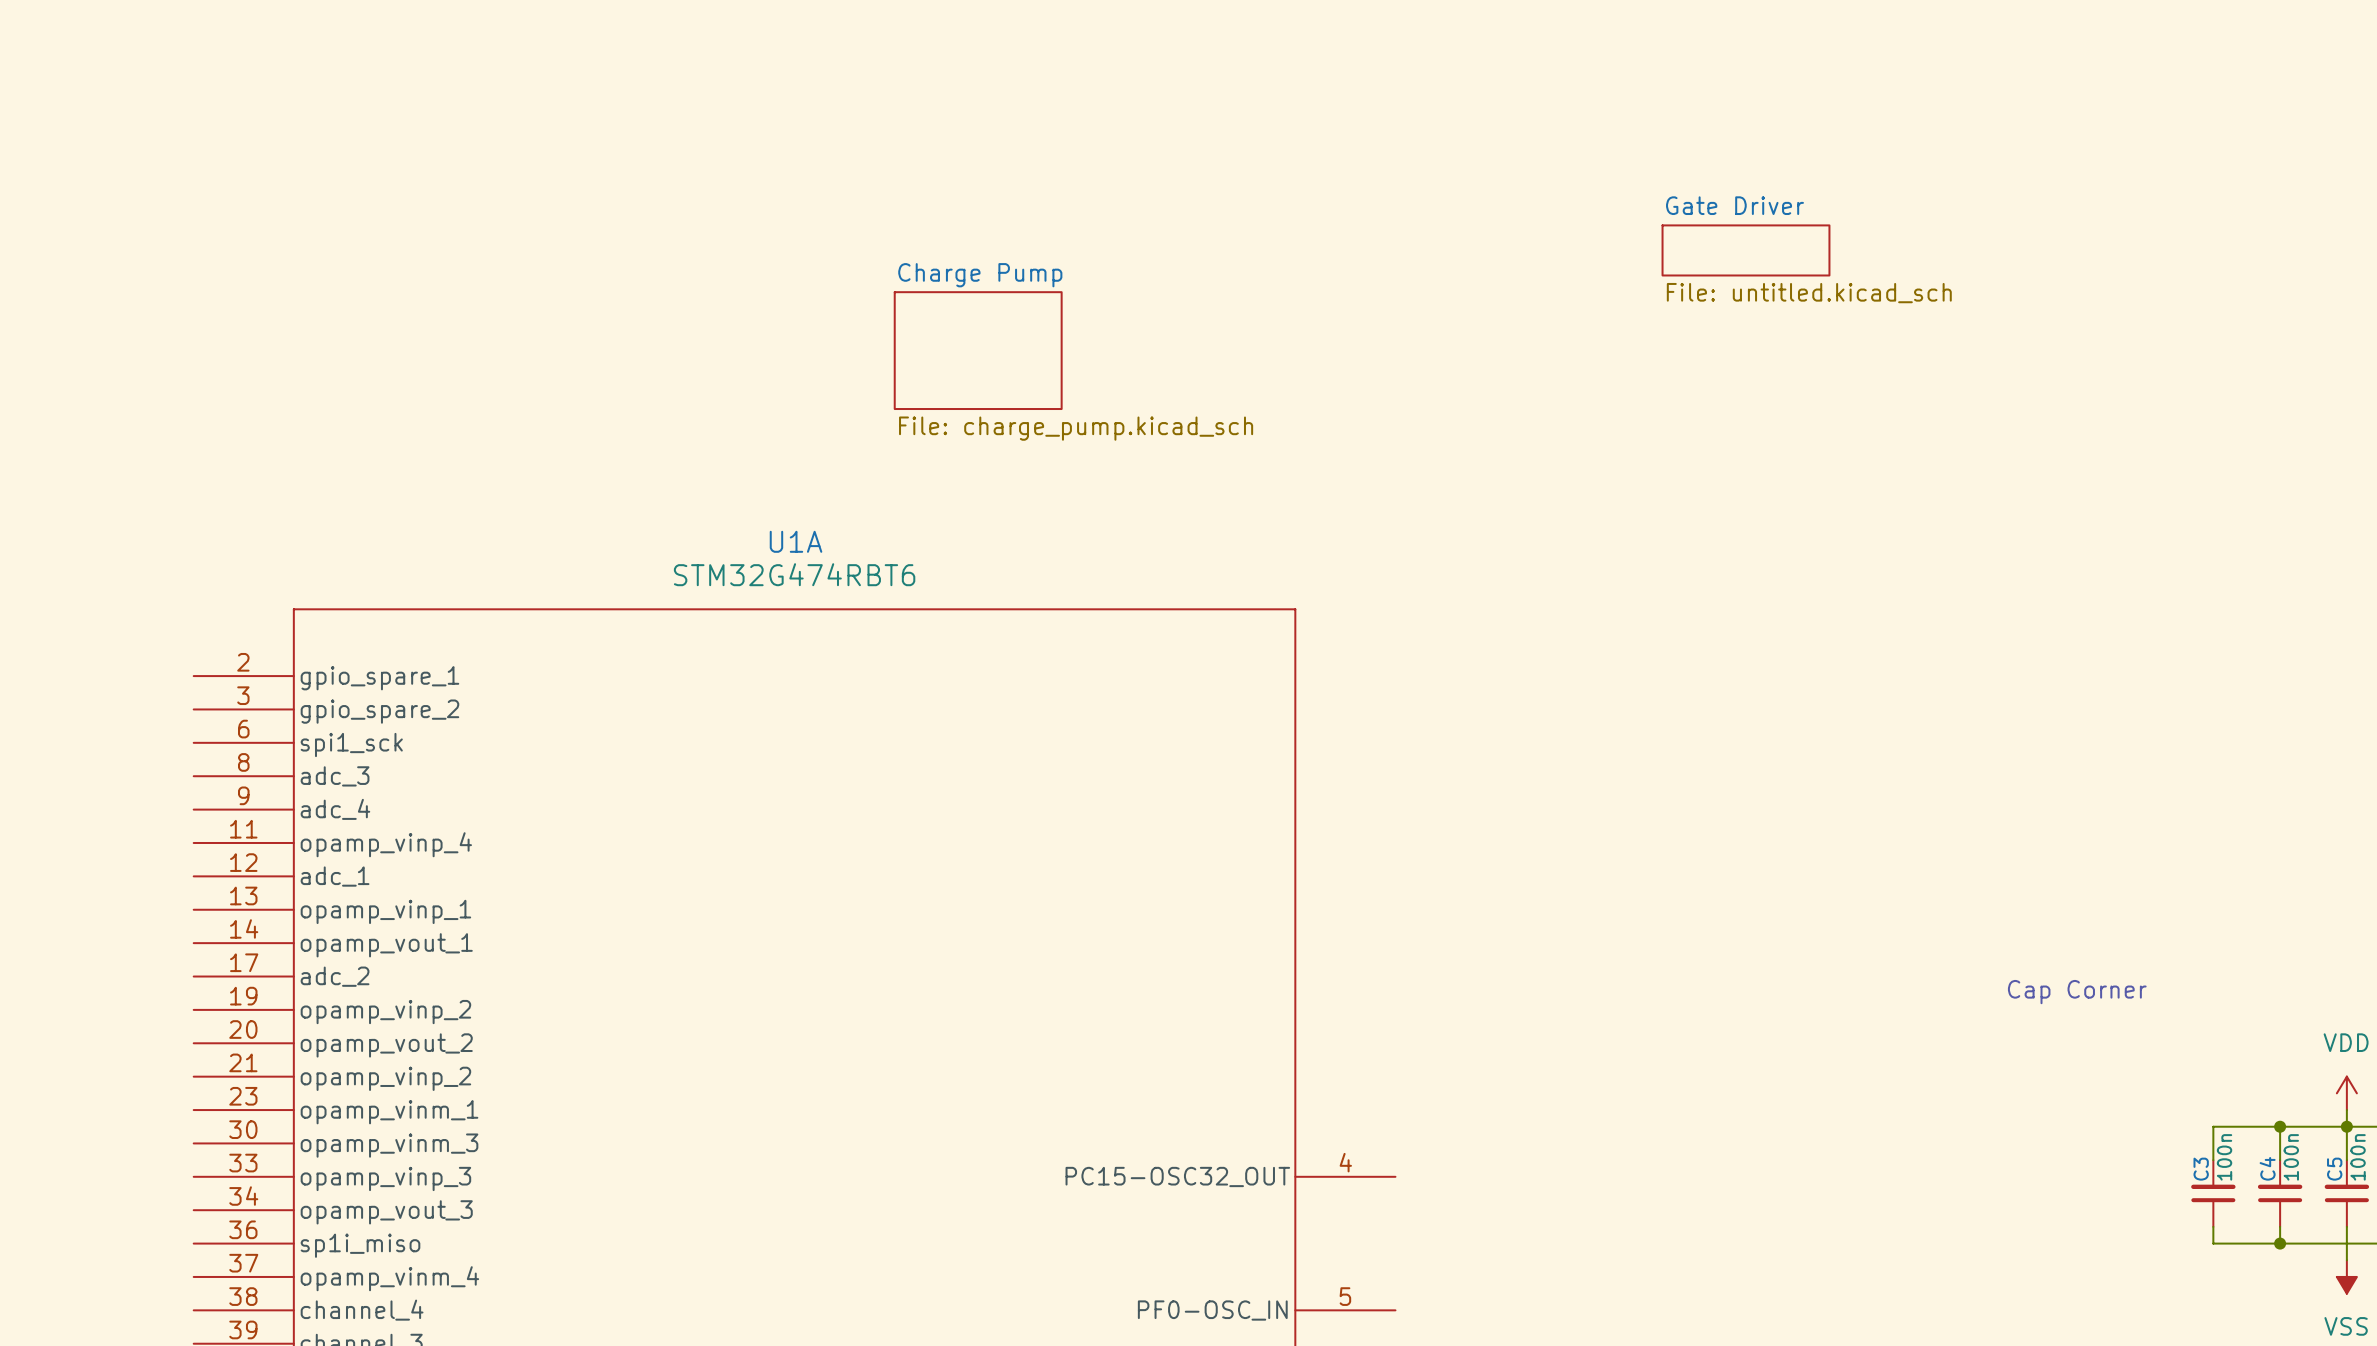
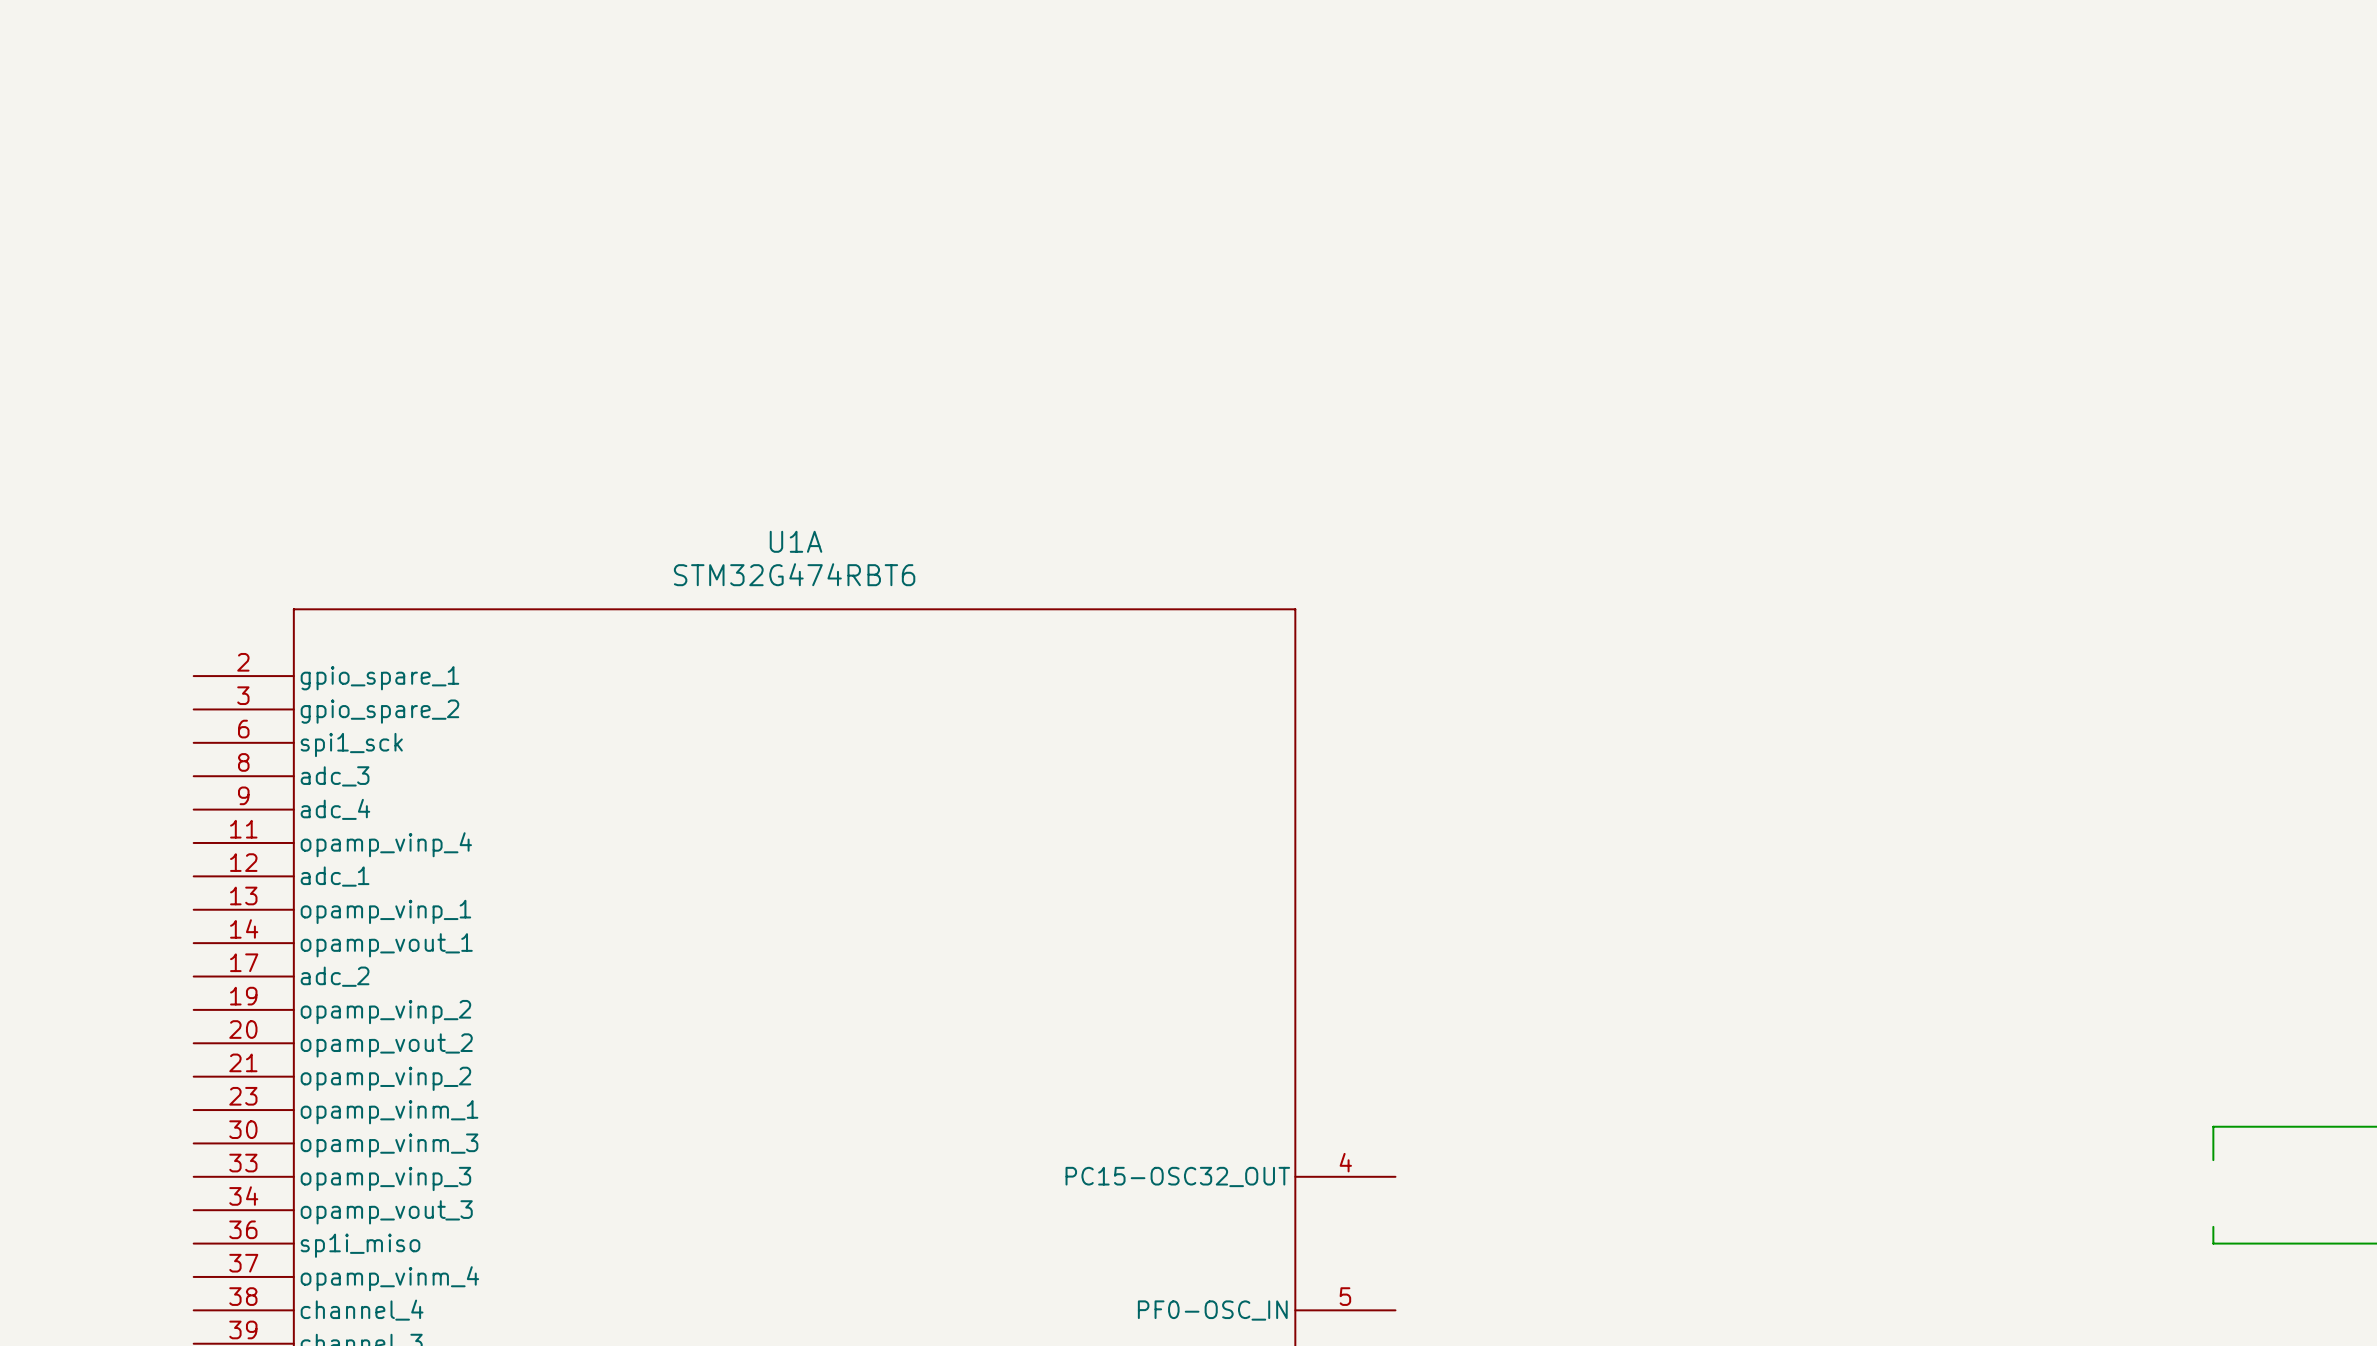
sheet Gate Driver: File: untitled.kicad_sch (1745, 250) -> none
sheet Charge Pump: File: charge_pump.kicad_sch (978, 350) -> none
text: Cap Corner (2077, 992) -> none
power symbol: VDD (2346, 1093) -> none
wire: (2346, 1110) (2346, 1160) -> none
wire: (2280, 1126) (2280, 1160) -> none
junction: (2280, 1126) -> none
junction: (2346, 1126) -> none
C3: 100n (2213, 1193) -> none
C4: 100n (2280, 1193) -> none
C5: 100n (2346, 1193) -> none
wire: (2280, 1226) (2280, 1243) -> none
wire: (2346, 1226) (2346, 1260) -> none
junction: (2280, 1243) -> none
power symbol: VSS (2346, 1276) -> none

